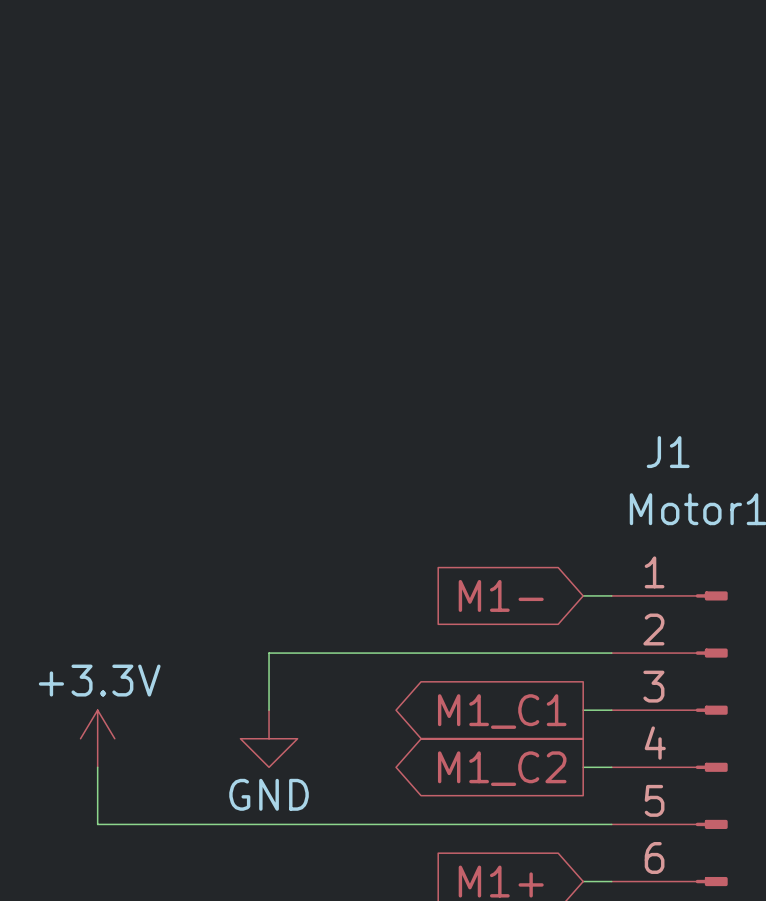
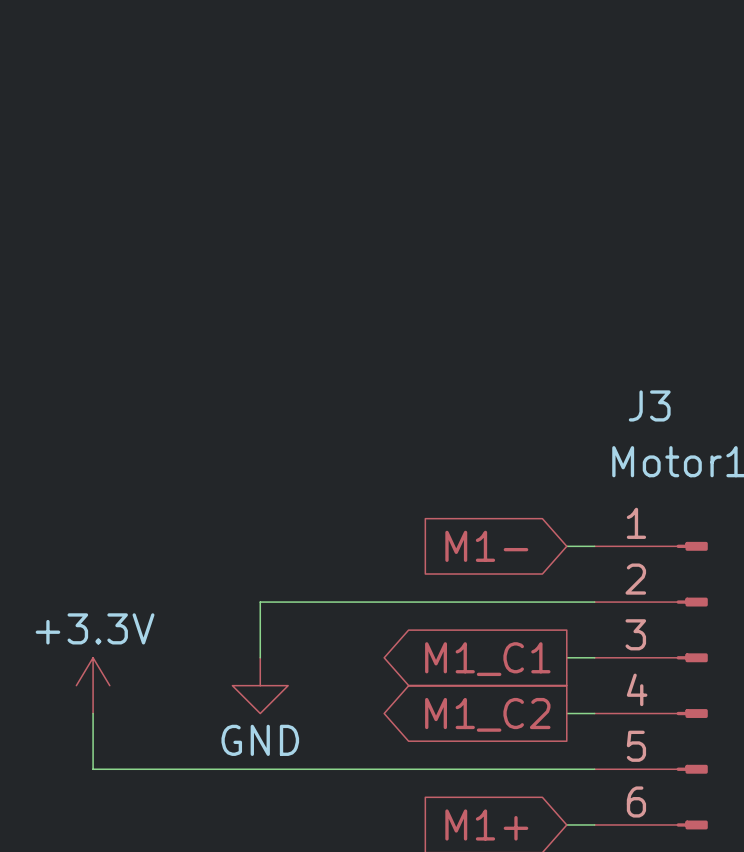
J1 name: J1 (668, 452) -> J3 (649, 405)

